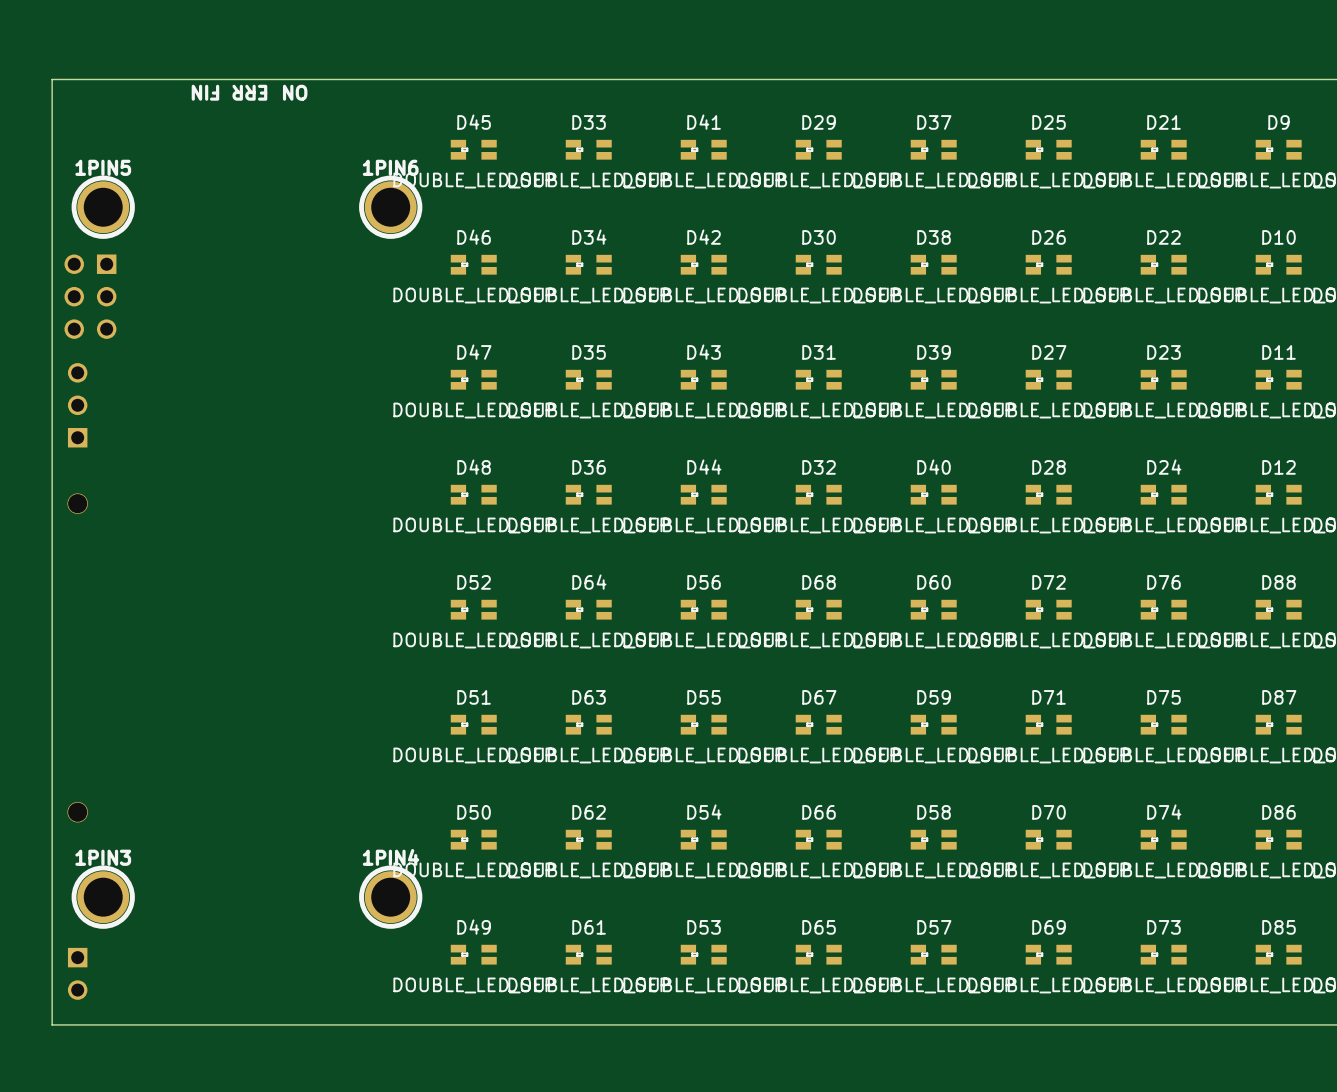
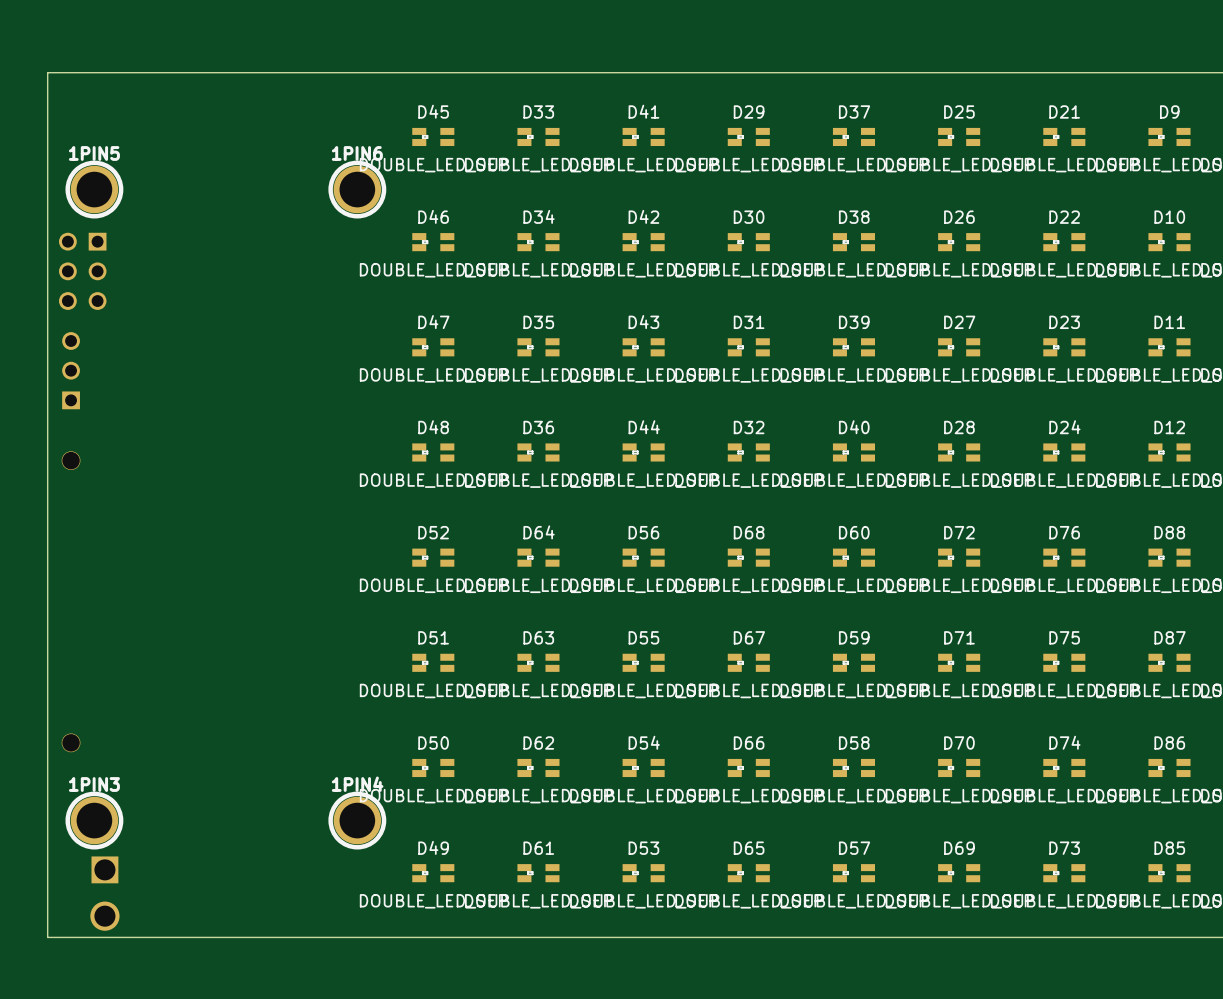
text: FIN (205, 92) -> none
text: ERR (249, 92) -> none
text: ON (295, 92) -> none
part: (77, 973) -> none
part: none -> (104, 893)

